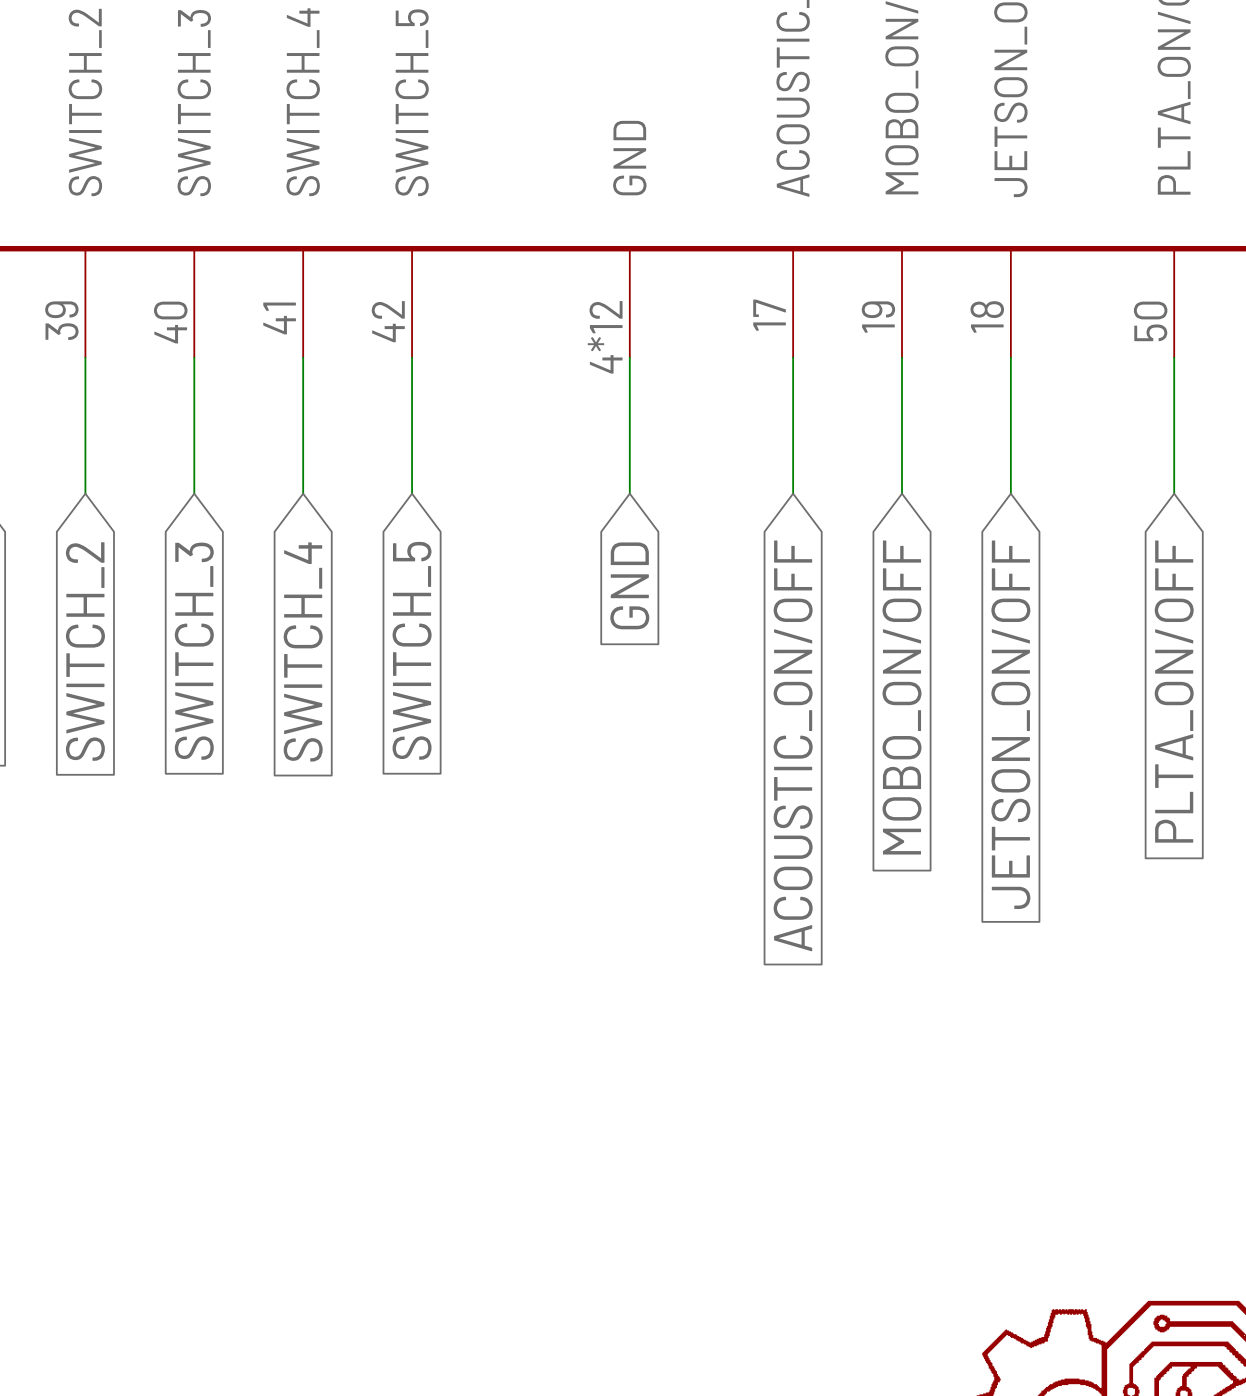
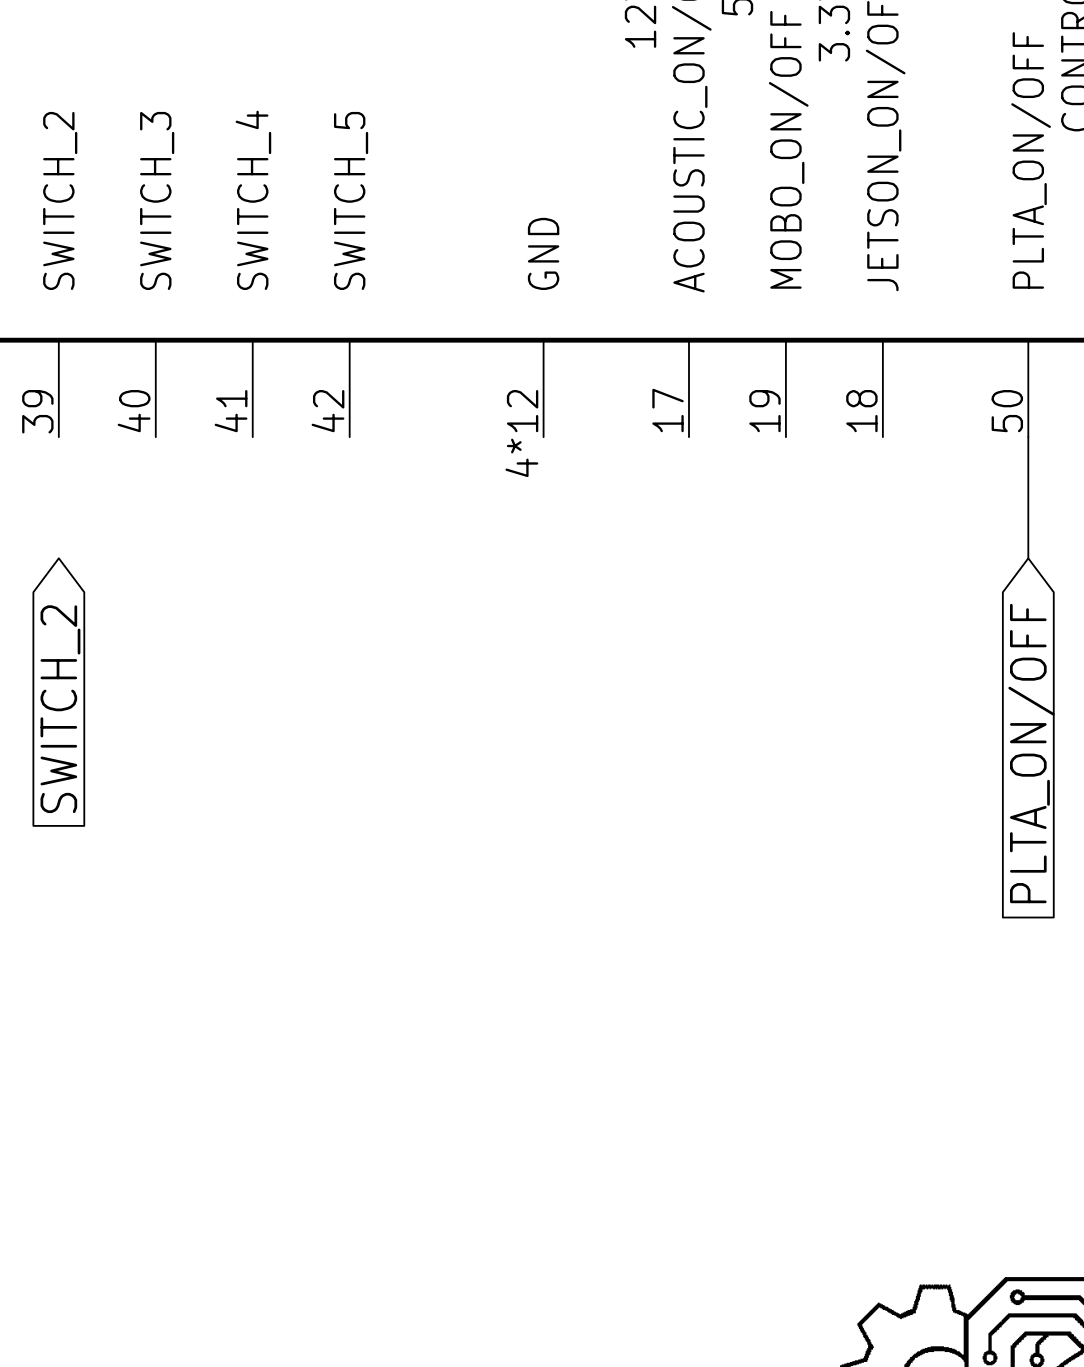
wire: (85, 357) (85, 493) -> none
wire: (194, 357) (194, 493) -> none
wire: (303, 357) (303, 493) -> none
wire: (412, 357) (412, 493) -> none
wire: (629, 357) (629, 493) -> none
wire: (793, 357) (793, 493) -> none
wire: (902, 357) (902, 493) -> none
wire: (1010, 357) (1010, 493) -> none
global label: GND (629, 585) -> none
global label: SWITCH_5 (412, 650) -> none
global label: SWITCH_3 (194, 651) -> none
global label: SWITCH_4 (303, 651) -> none
global label: MOBO_ON/OFF (902, 697) -> none
global label: JETSON_ON/OFF (1010, 724) -> none
global label: ACOUSTIC_ON/OFF (793, 745) -> none

